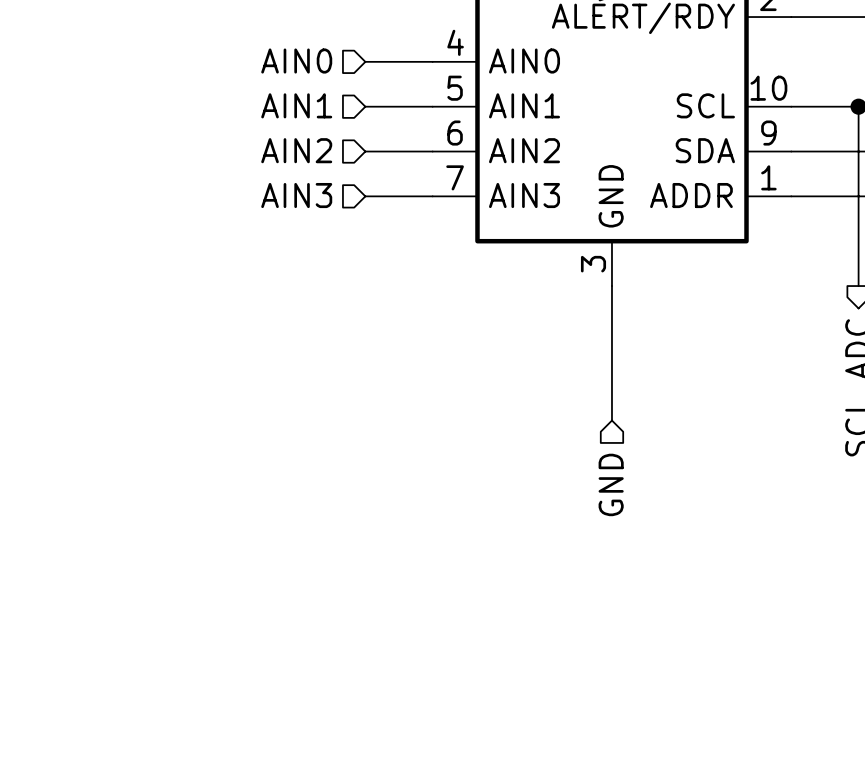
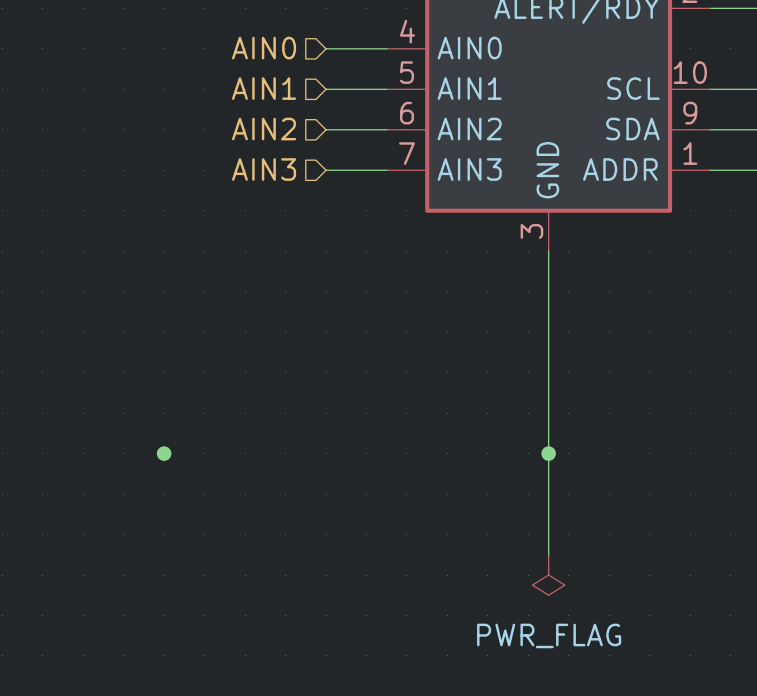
wire: none -> (548, 372) (548, 554)
hierarchical label: GND (611, 484) -> none
junction: none -> (164, 453)
junction: none -> (548, 453)
power symbol: none -> PWR_FLAG (548, 575)

